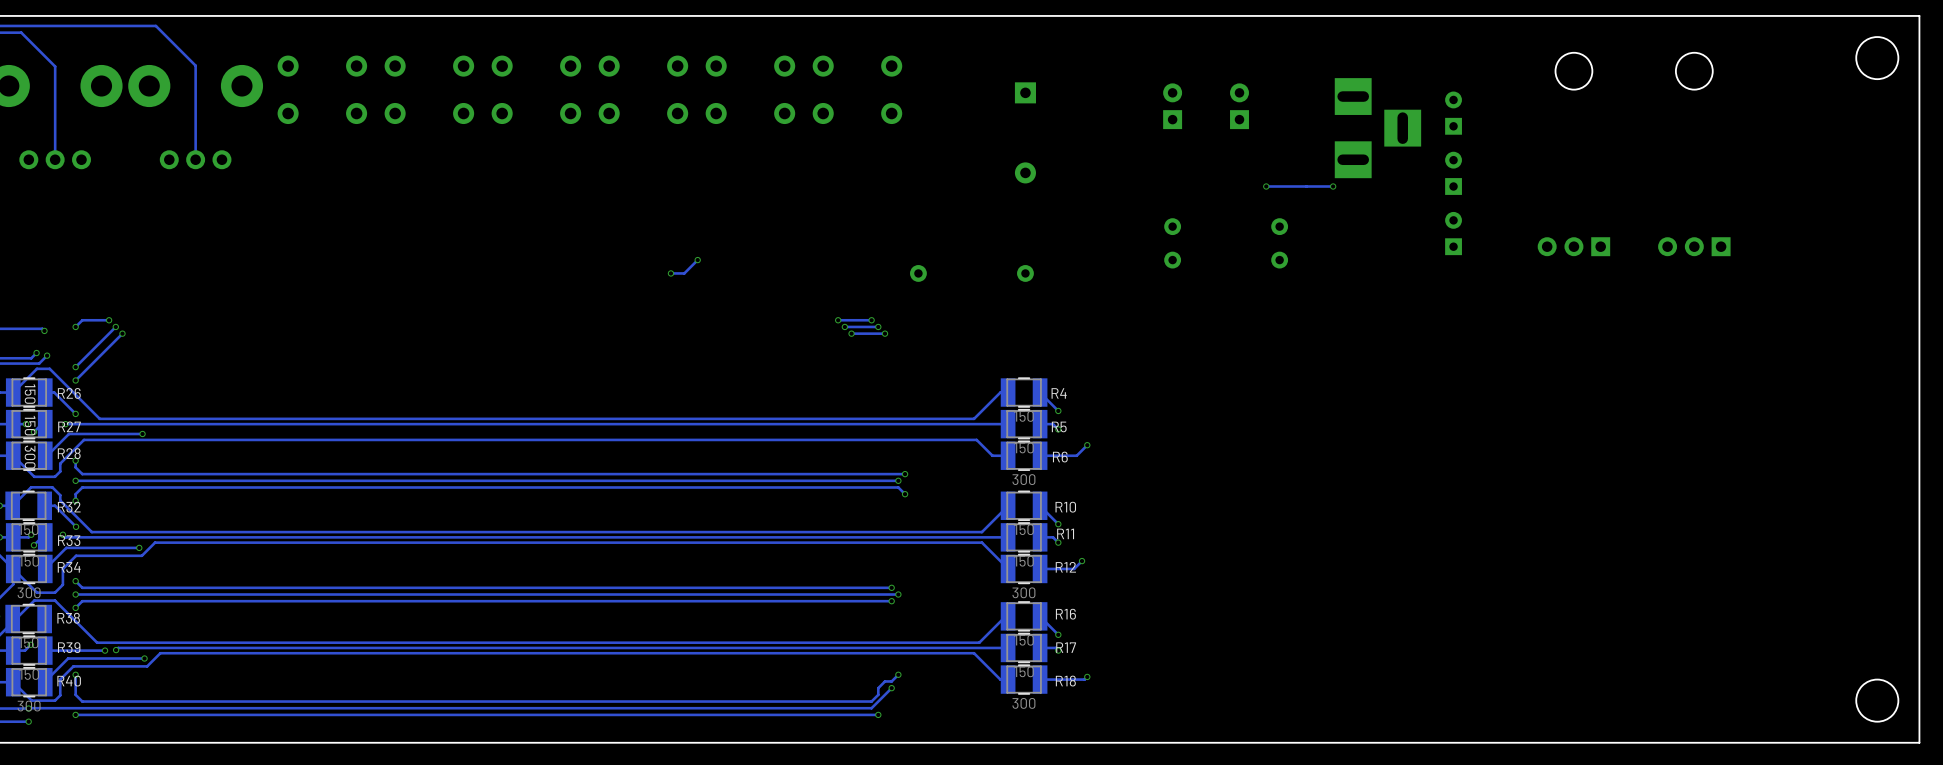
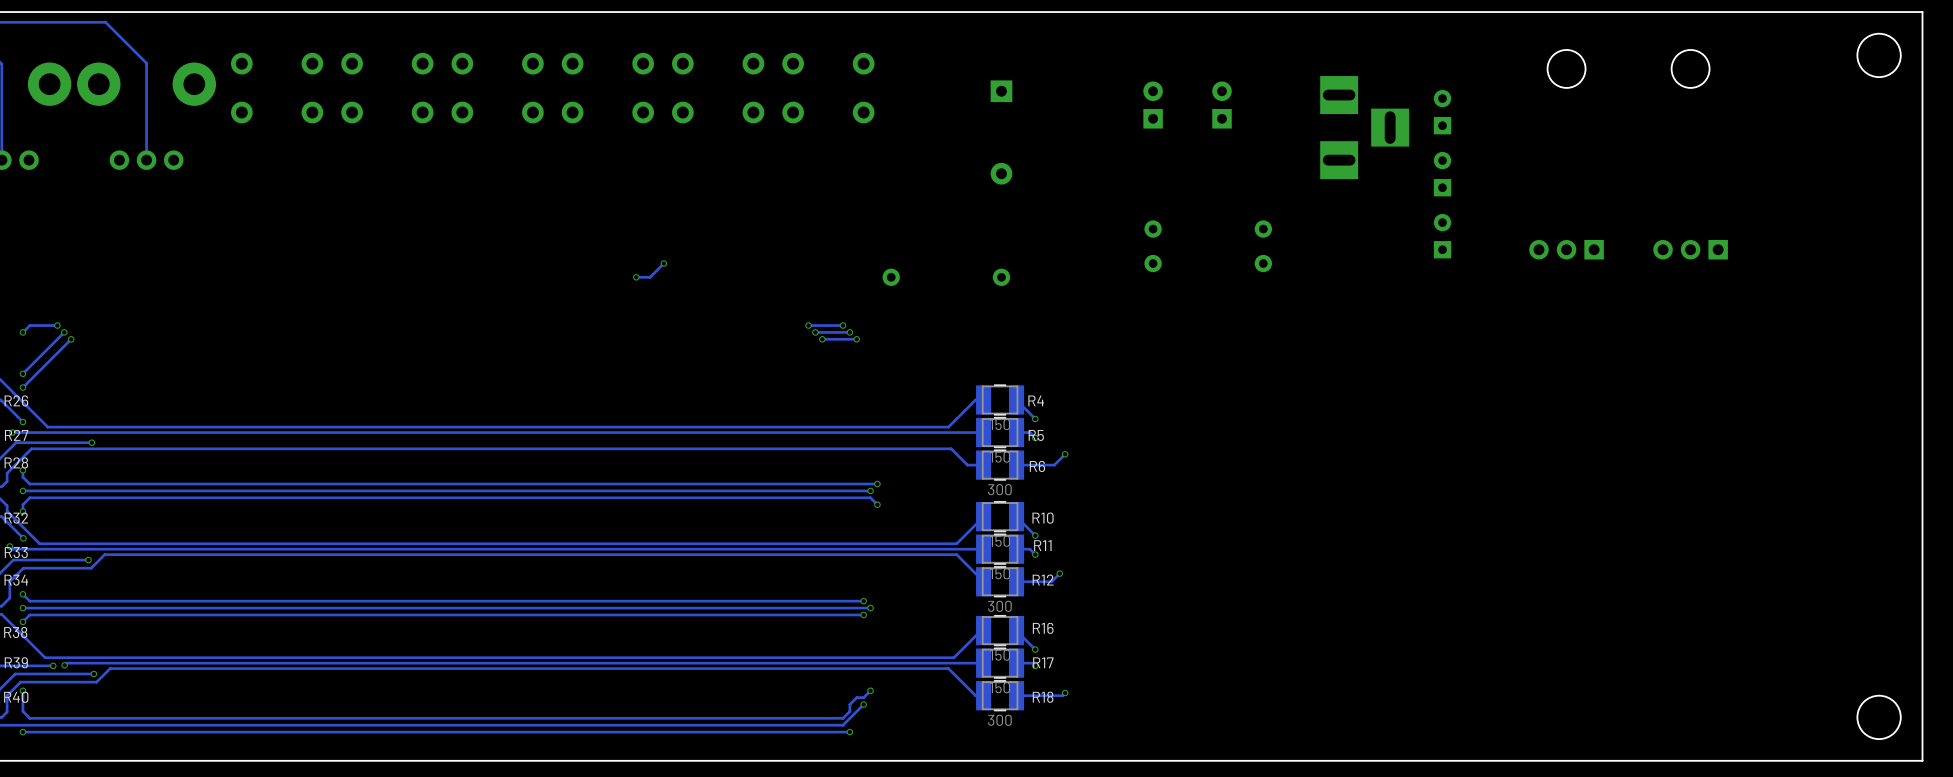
via: (1266, 186) -> none
track: (1333, 186) (1266, 186) -> none
via: (1333, 186) -> none

